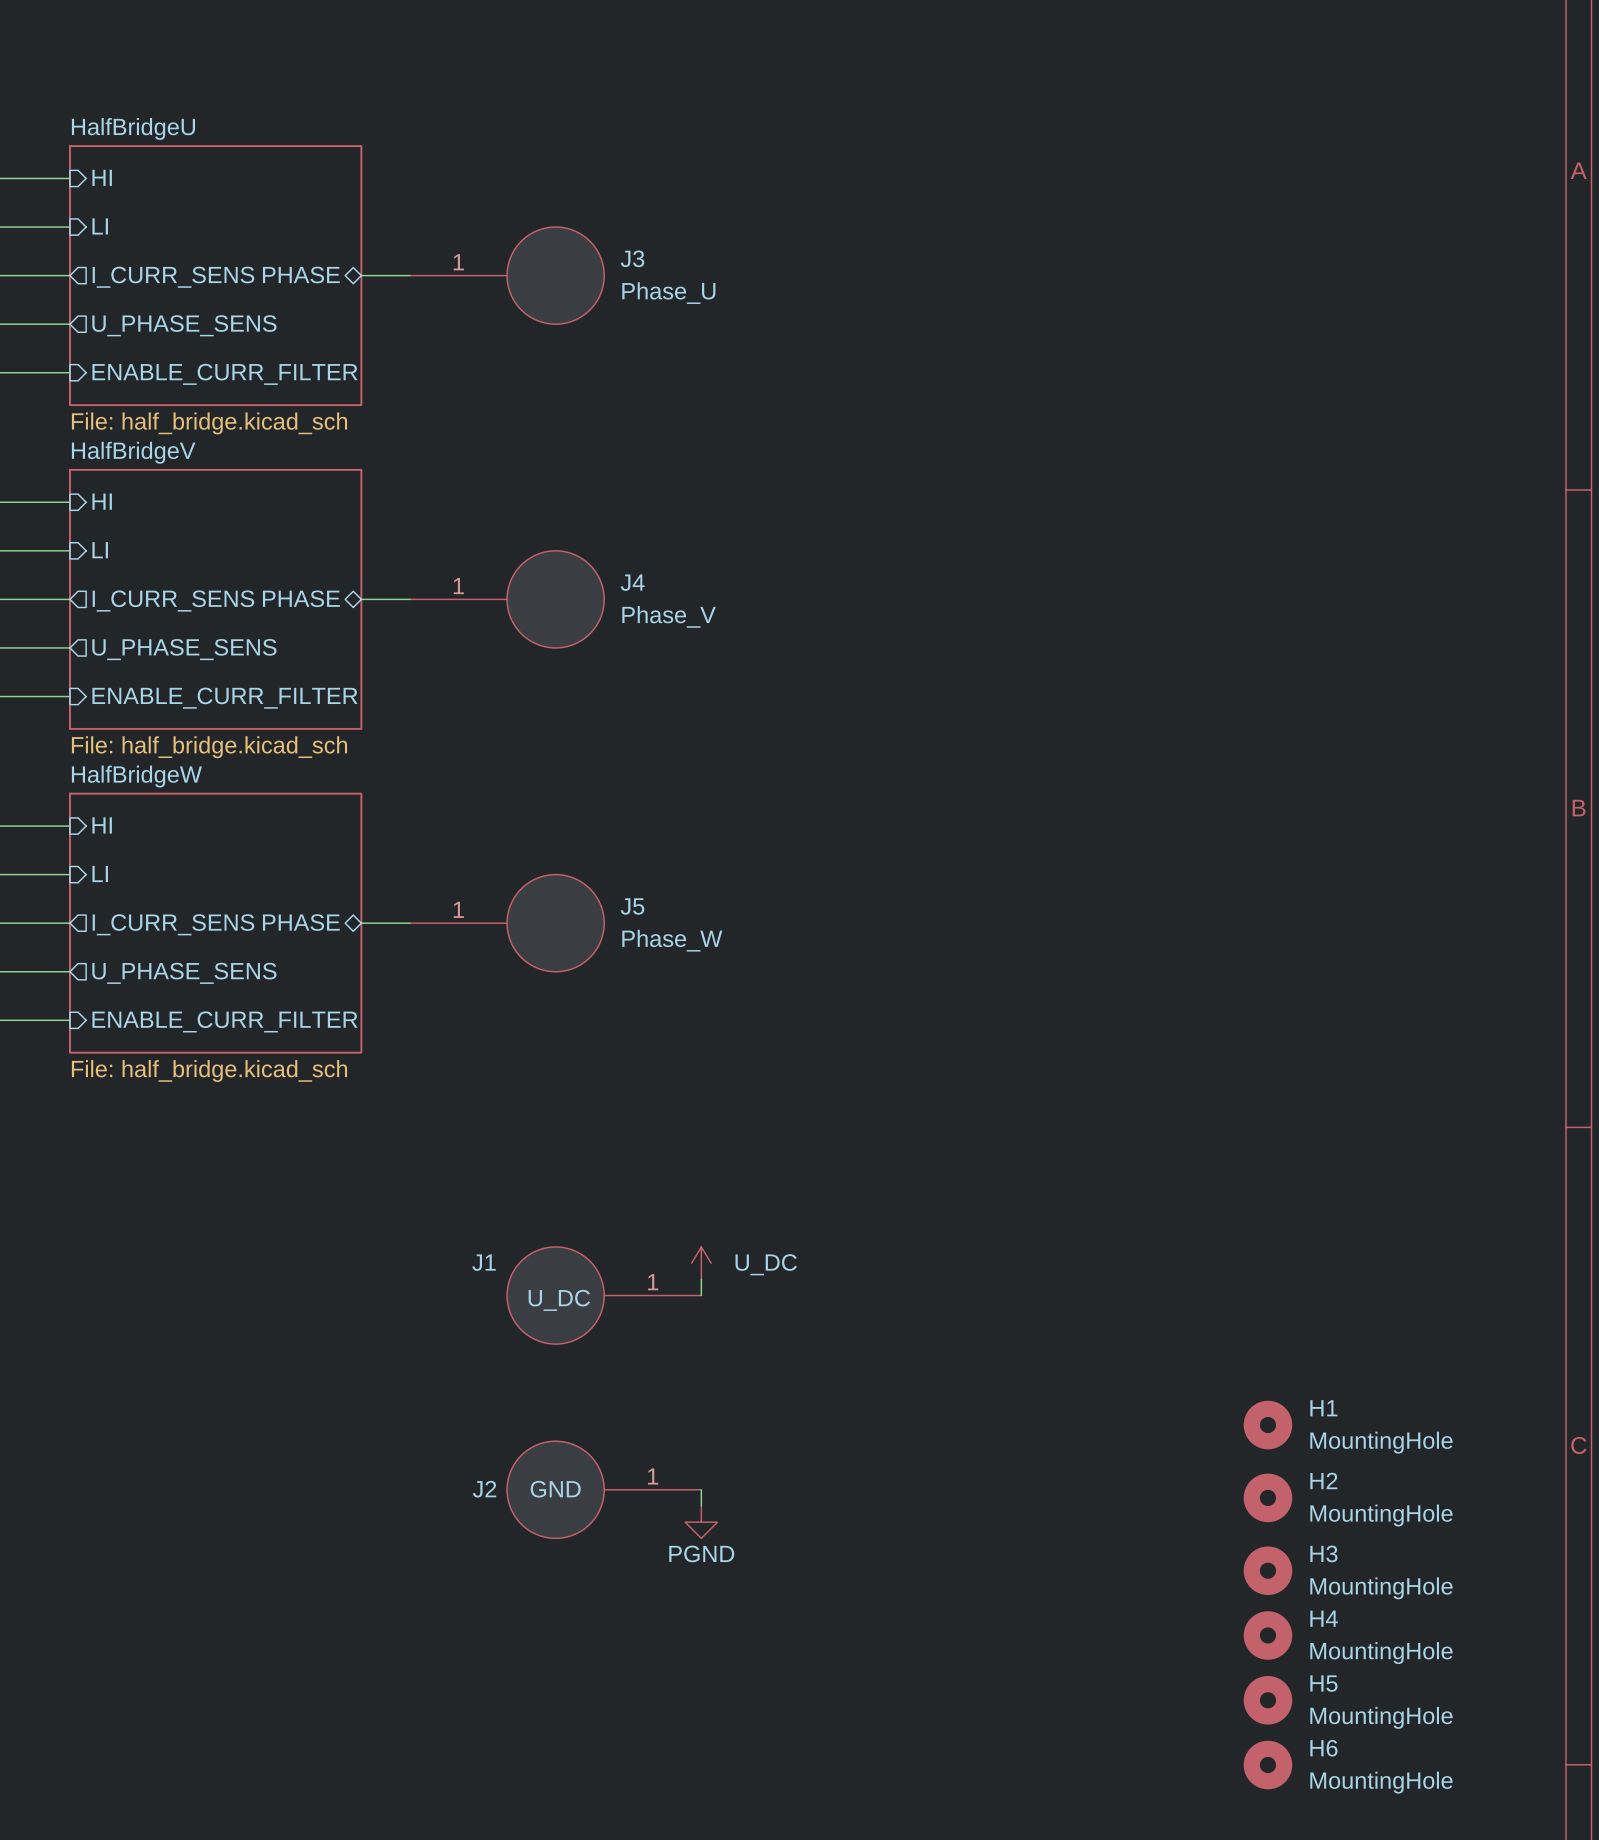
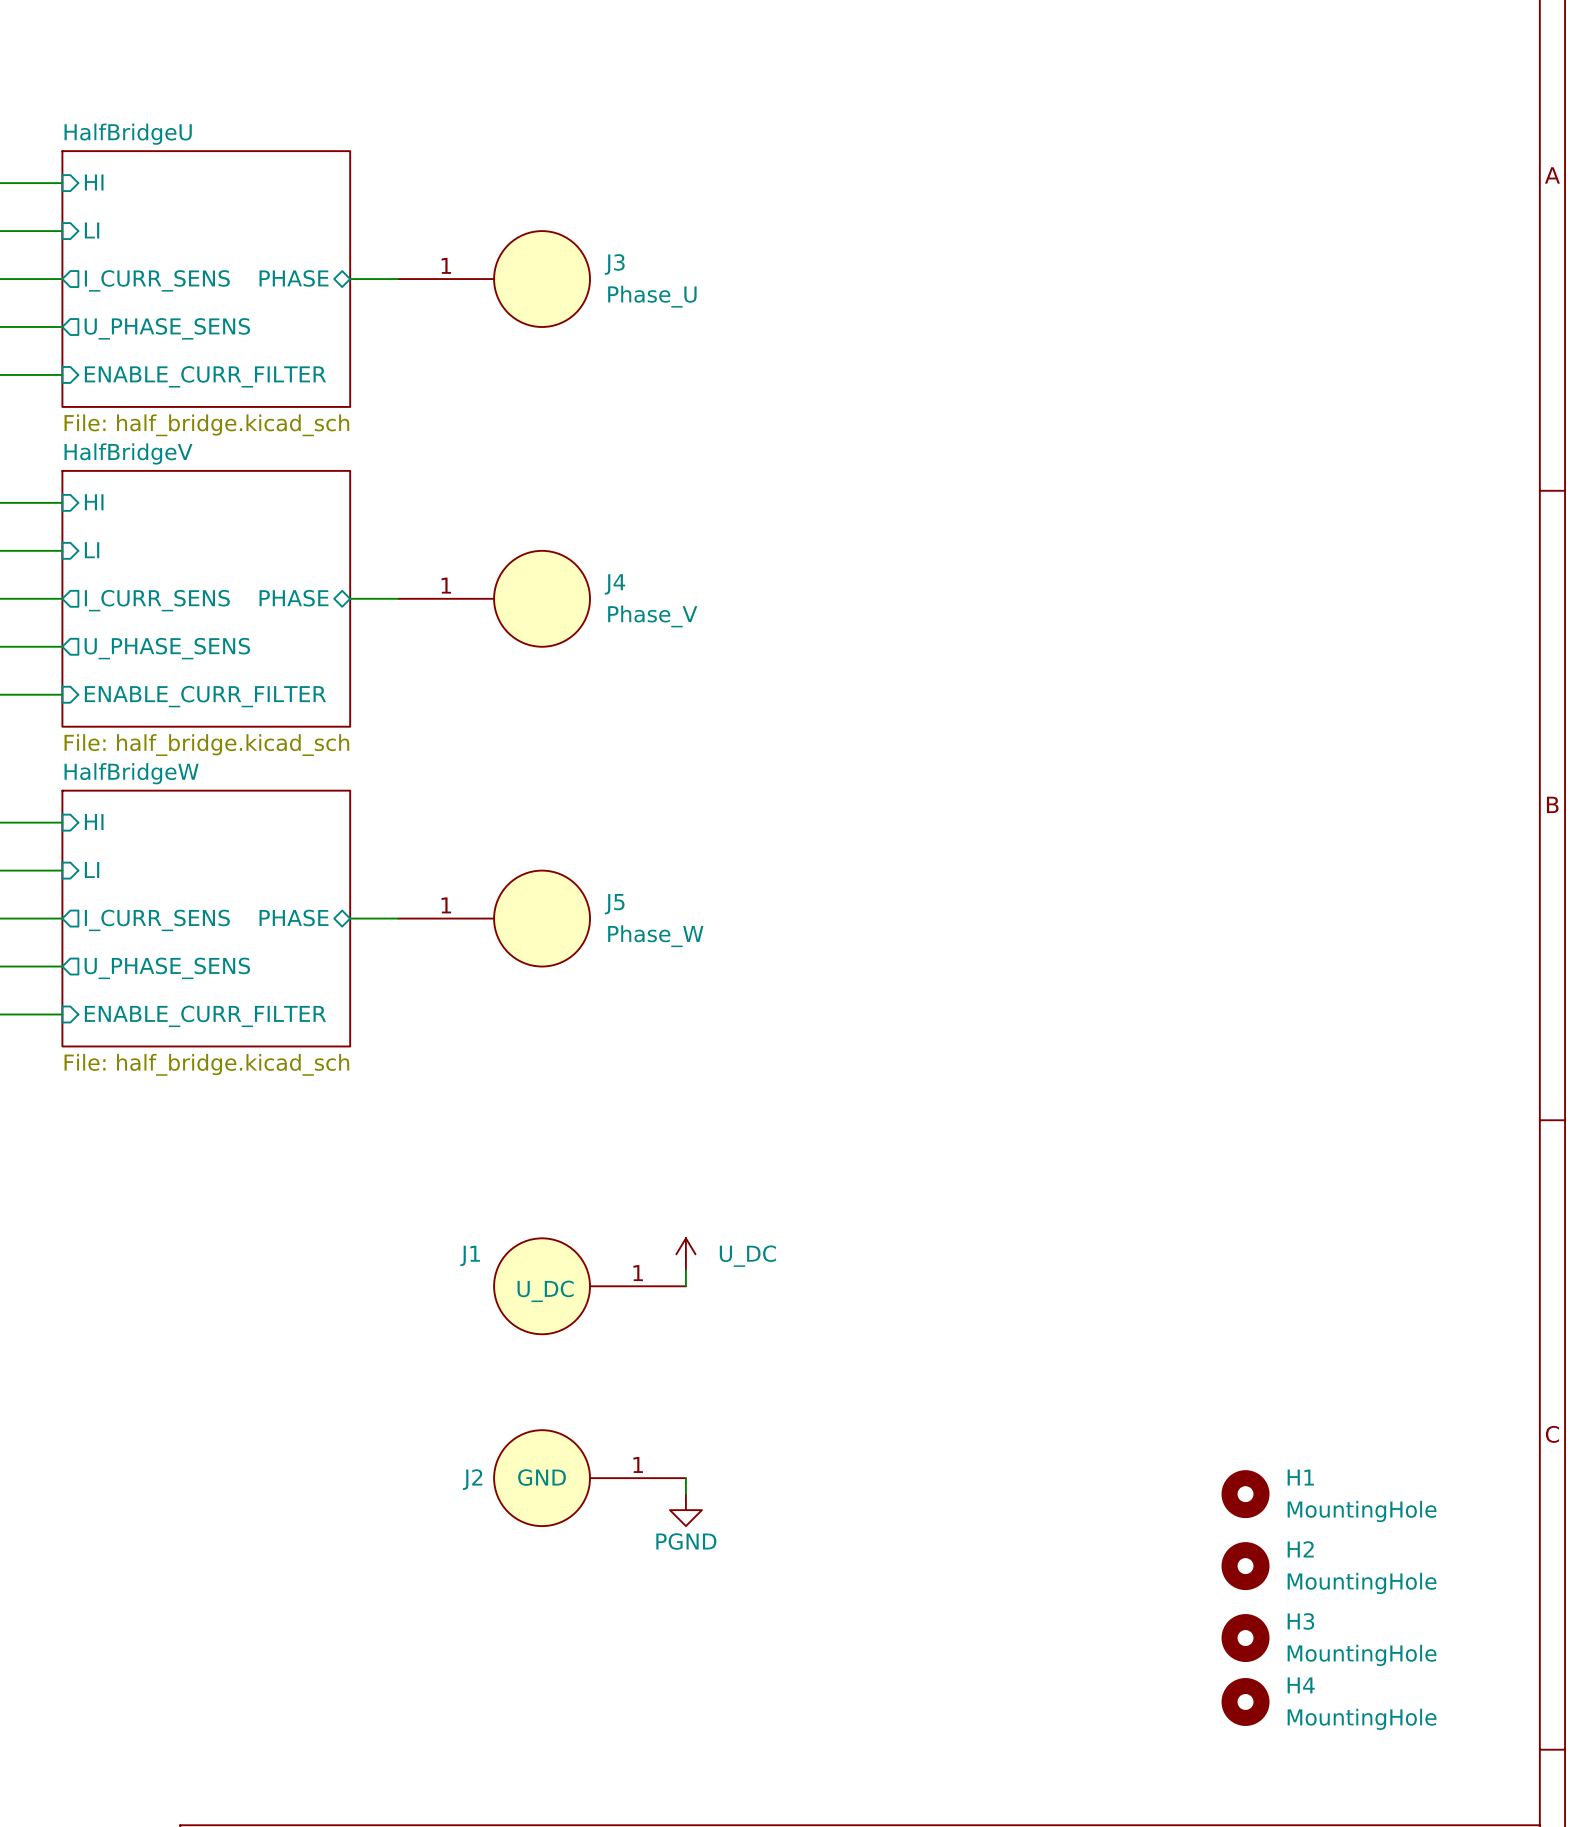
H1 position: (1267, 1425) -> (1245, 1494)
H2 position: (1267, 1497) -> (1245, 1566)
H3 position: (1267, 1570) -> (1245, 1638)
H4 position: (1267, 1635) -> (1245, 1701)
H5: MountingHole (1267, 1700) -> none
H6: MountingHole (1267, 1765) -> none

